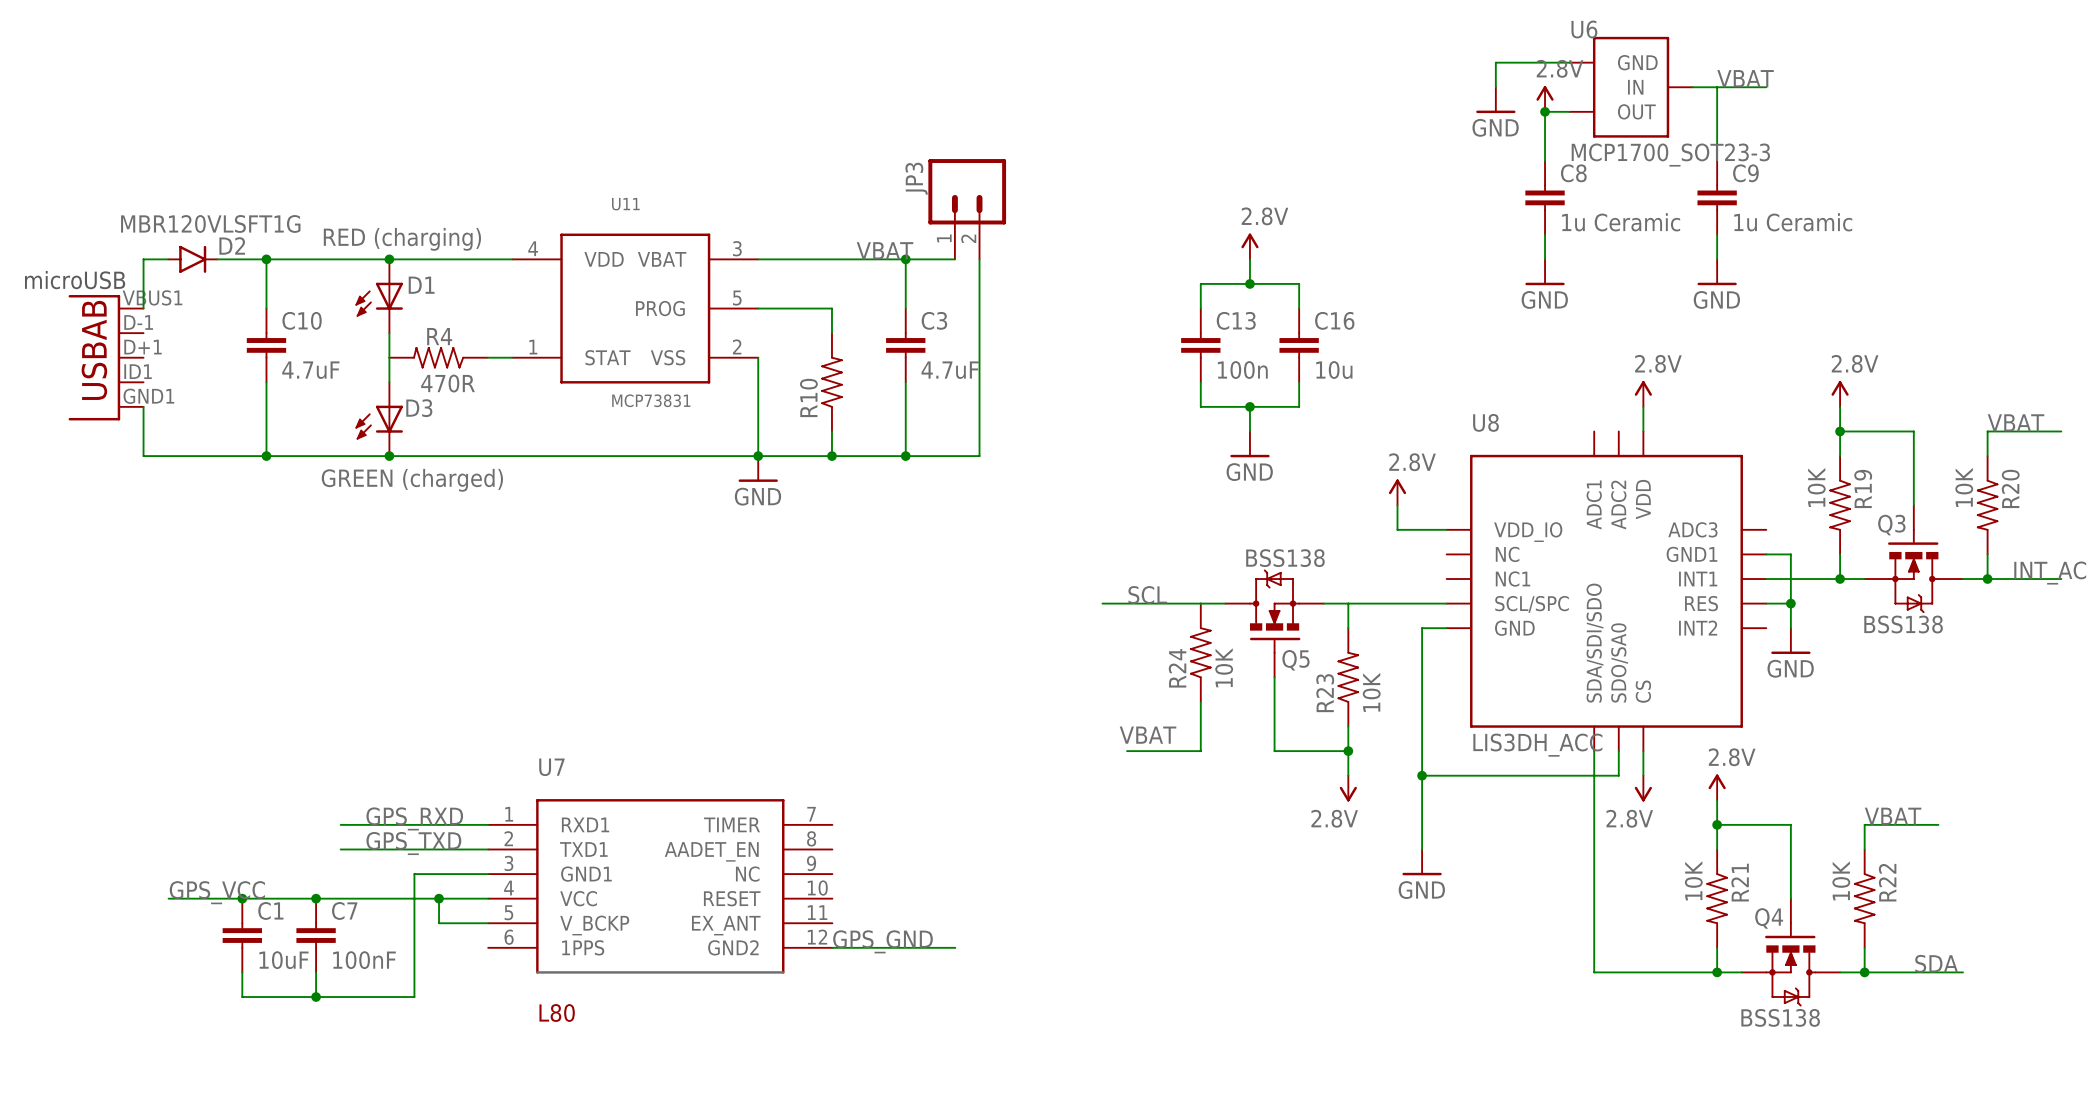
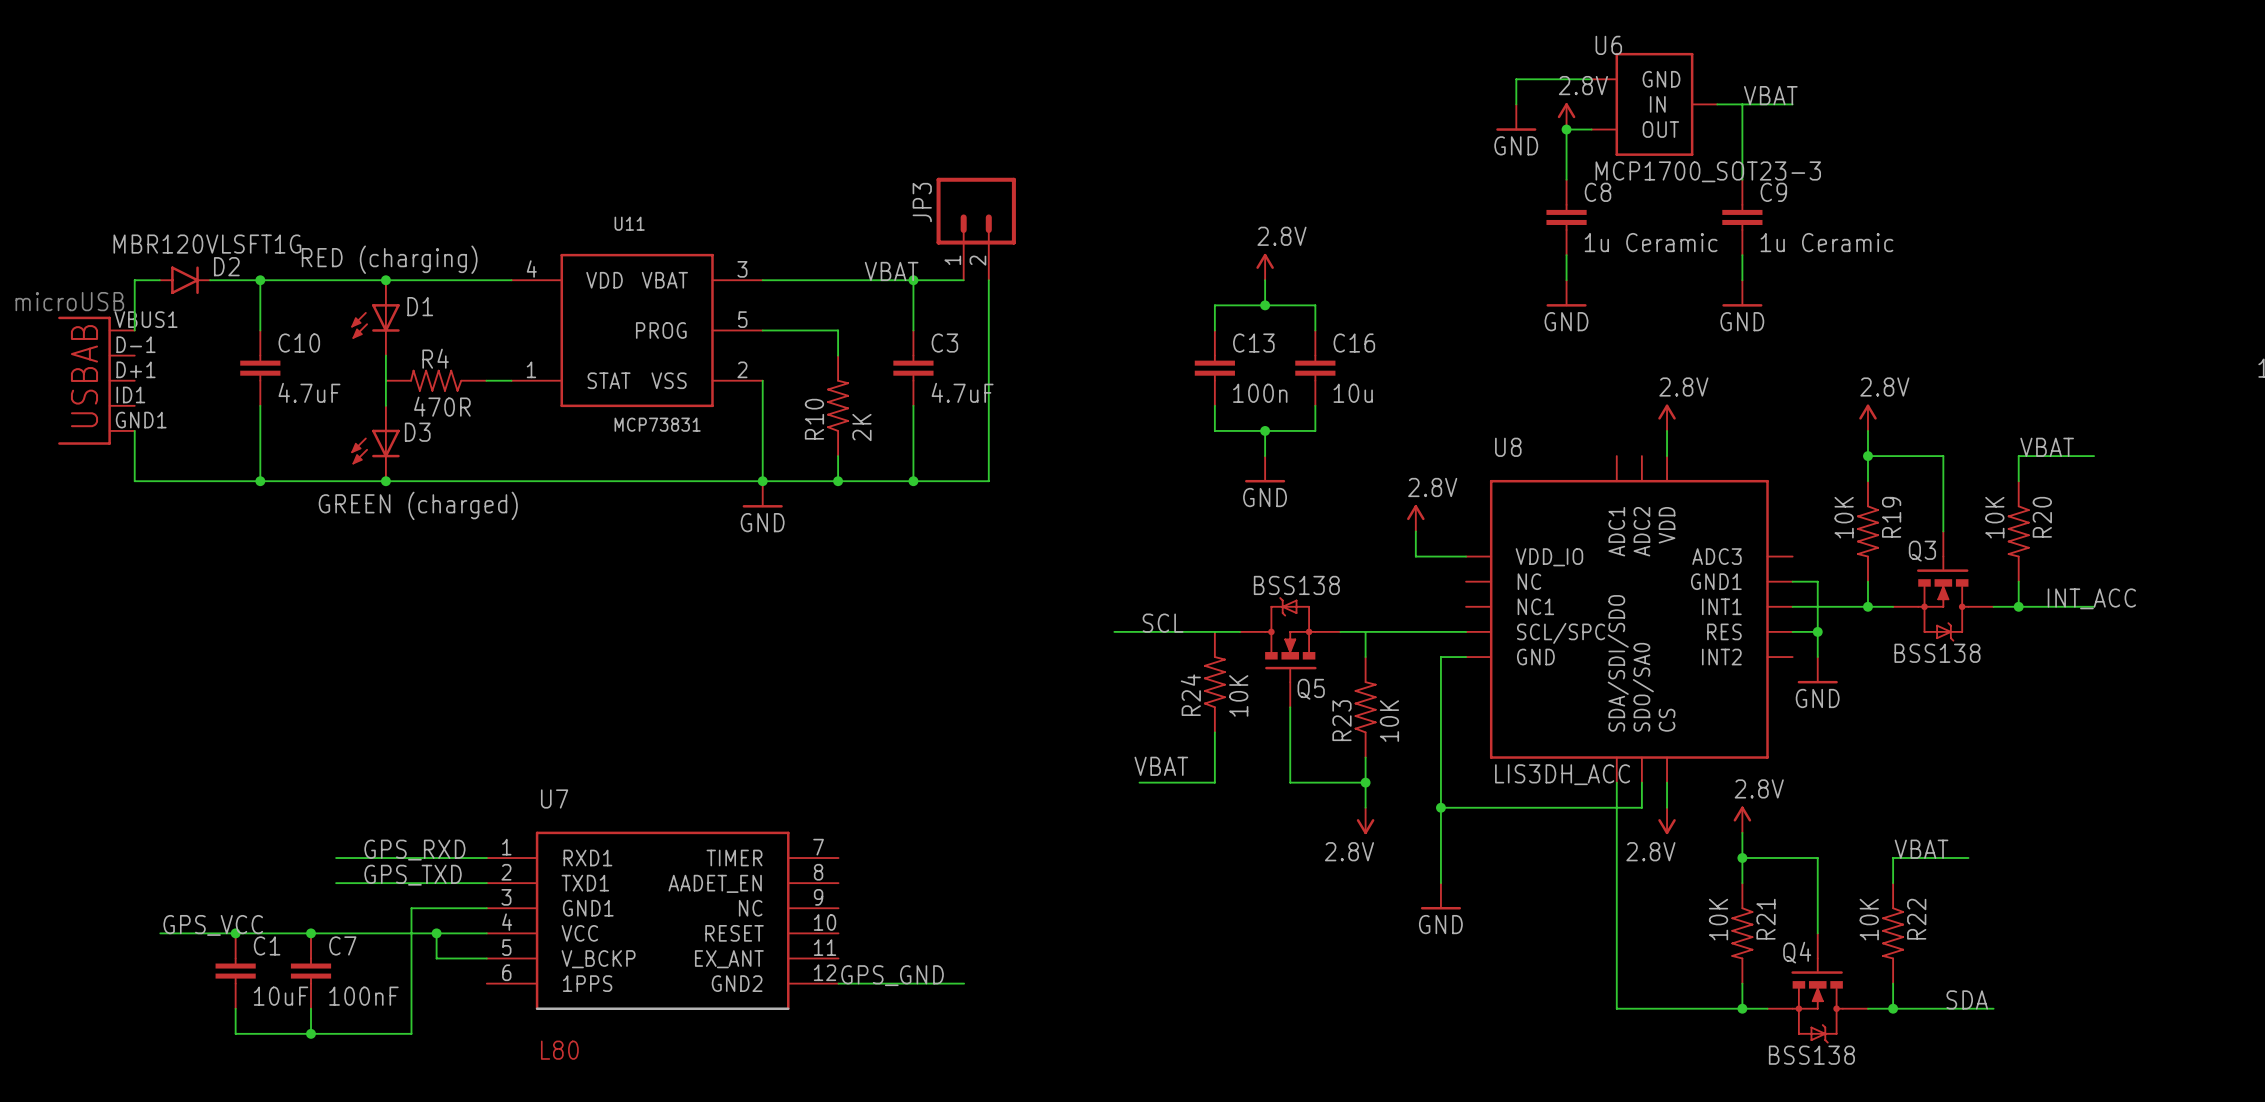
R10 value: none -> 2K (861, 427)

